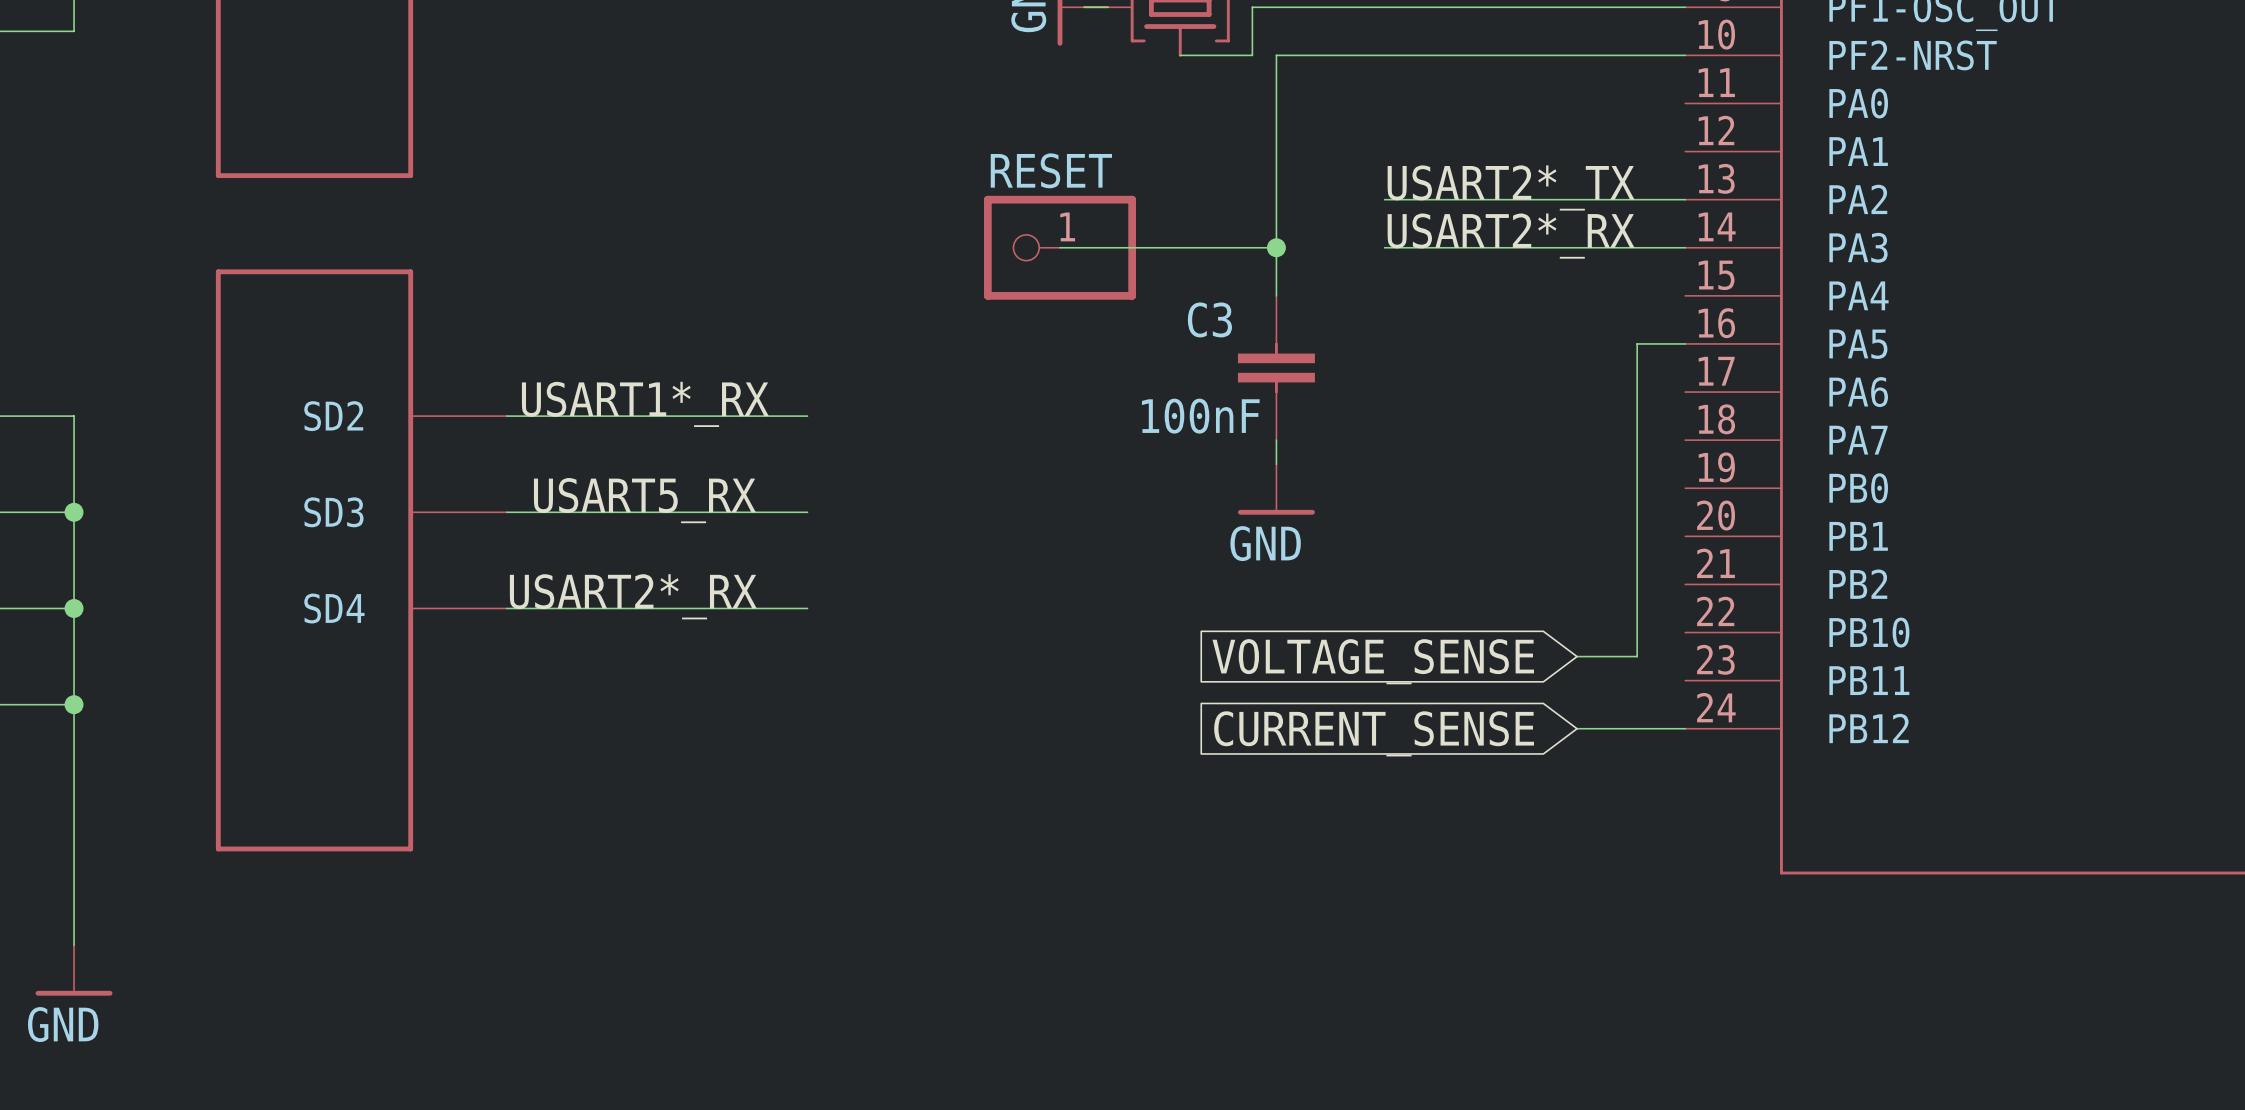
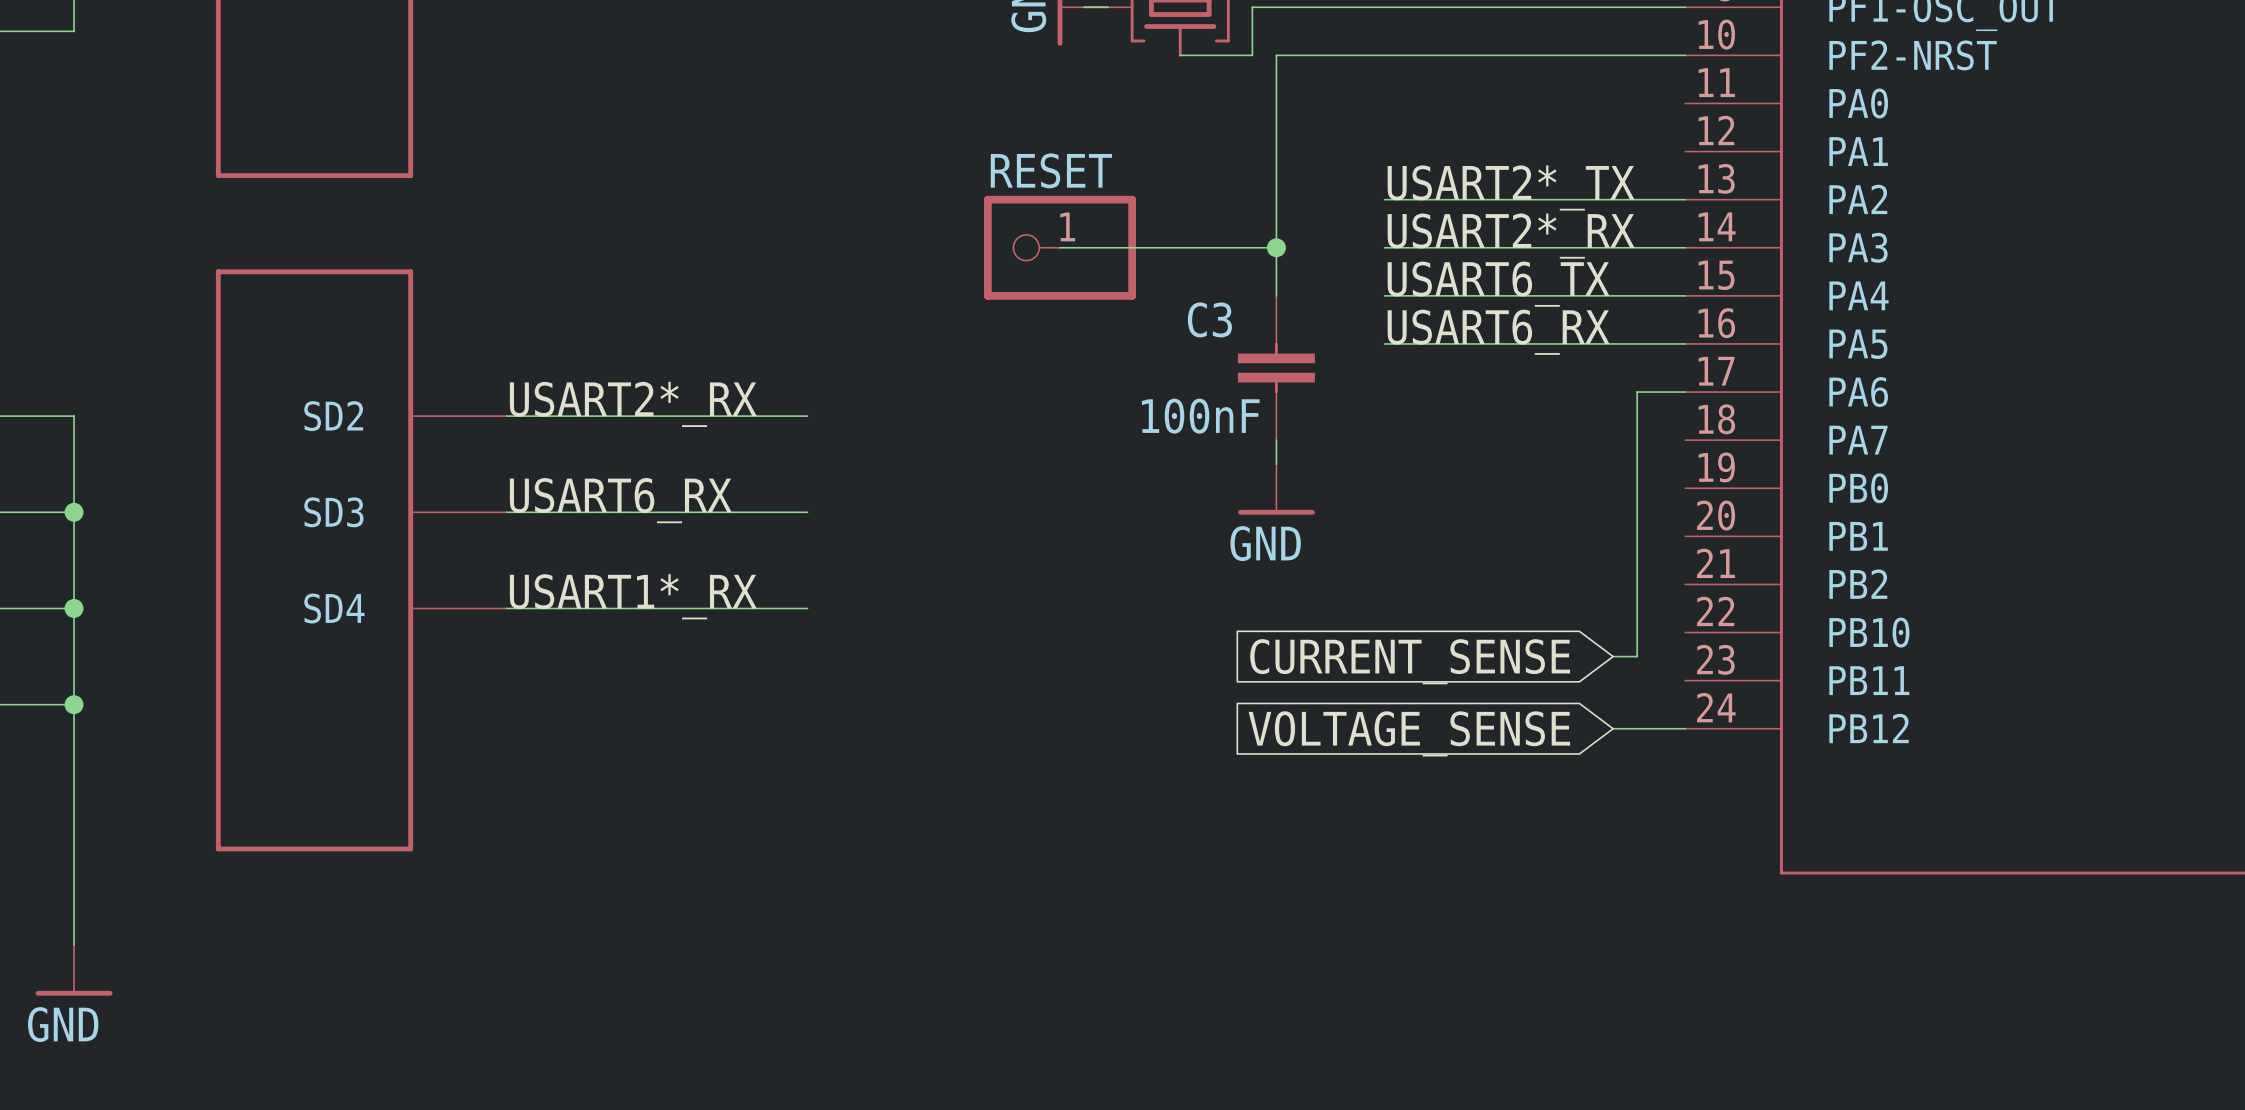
label: none -> USART6_TX (1498, 284)
wire: none -> (1384, 295) (1685, 295)
label: none -> USART6_RX (1498, 332)
wire: none -> (1384, 343) (1637, 343)
wire: (1637, 343) (1637, 392) -> (1685, 392) (1637, 392)
label: USART1*_RX (645, 404) -> USART2*_RX (633, 404)
label: USART5_RX (644, 500) -> USART6_RX (620, 500)
label: USART2*_RX (633, 596) -> USART1*_RX (633, 596)
wire: (1577, 656) (1613, 656) -> none
global label position: VOLTAGE_SENSE (1373, 661) -> VOLTAGE_SENSE (1409, 733)
wire: (1577, 728) (1613, 728) -> none
global label position: CURRENT_SENSE (1374, 733) -> CURRENT_SENSE (1410, 661)

